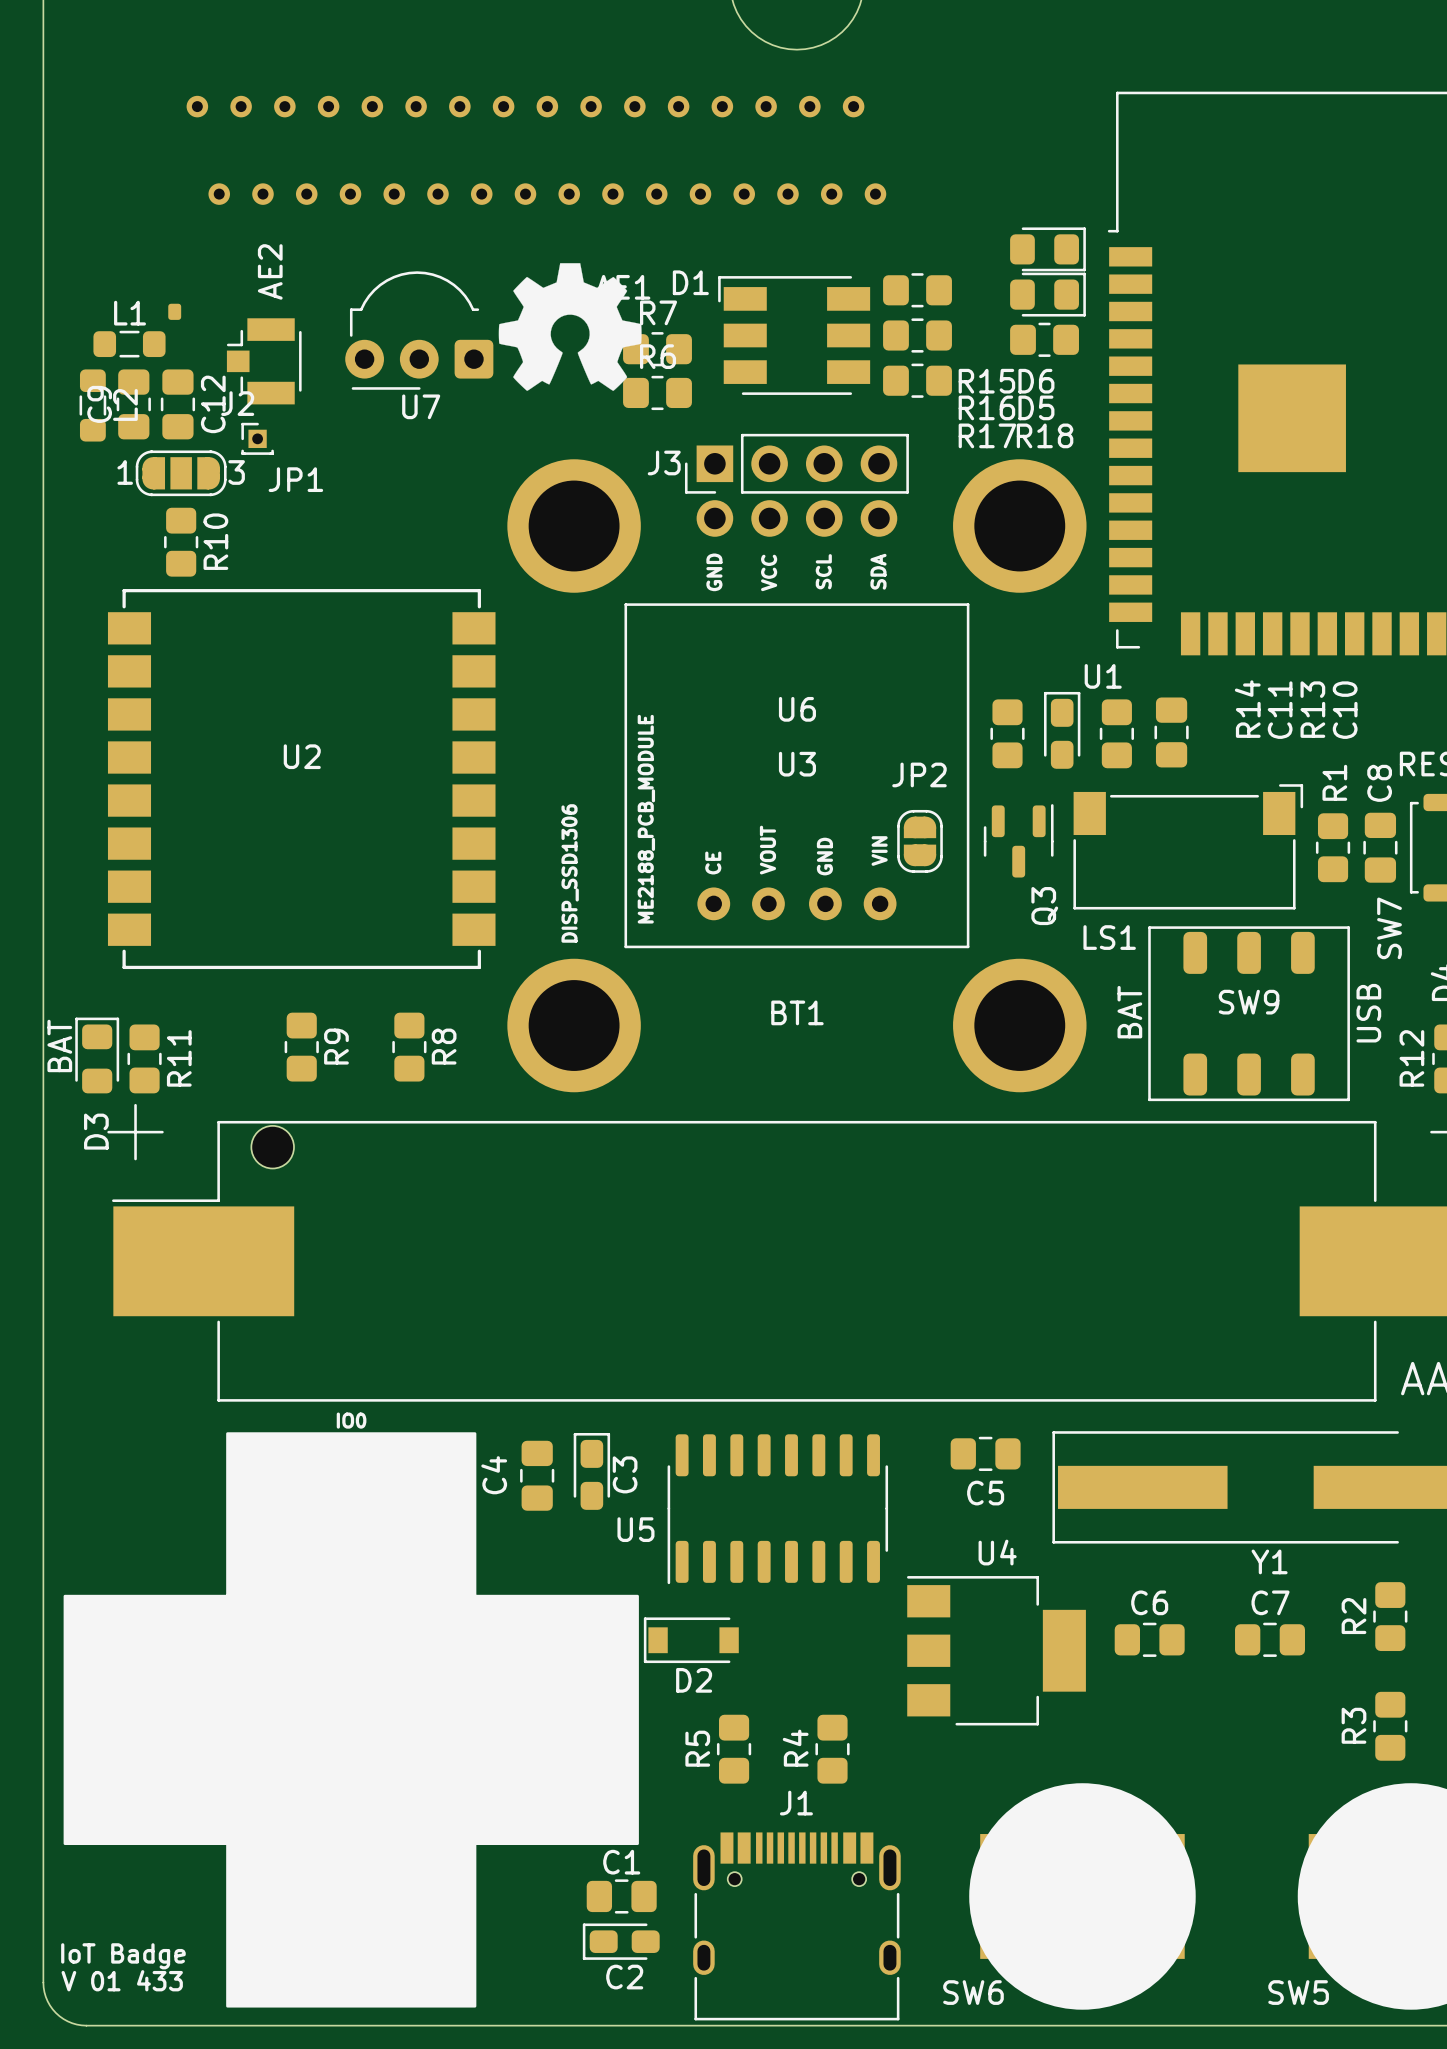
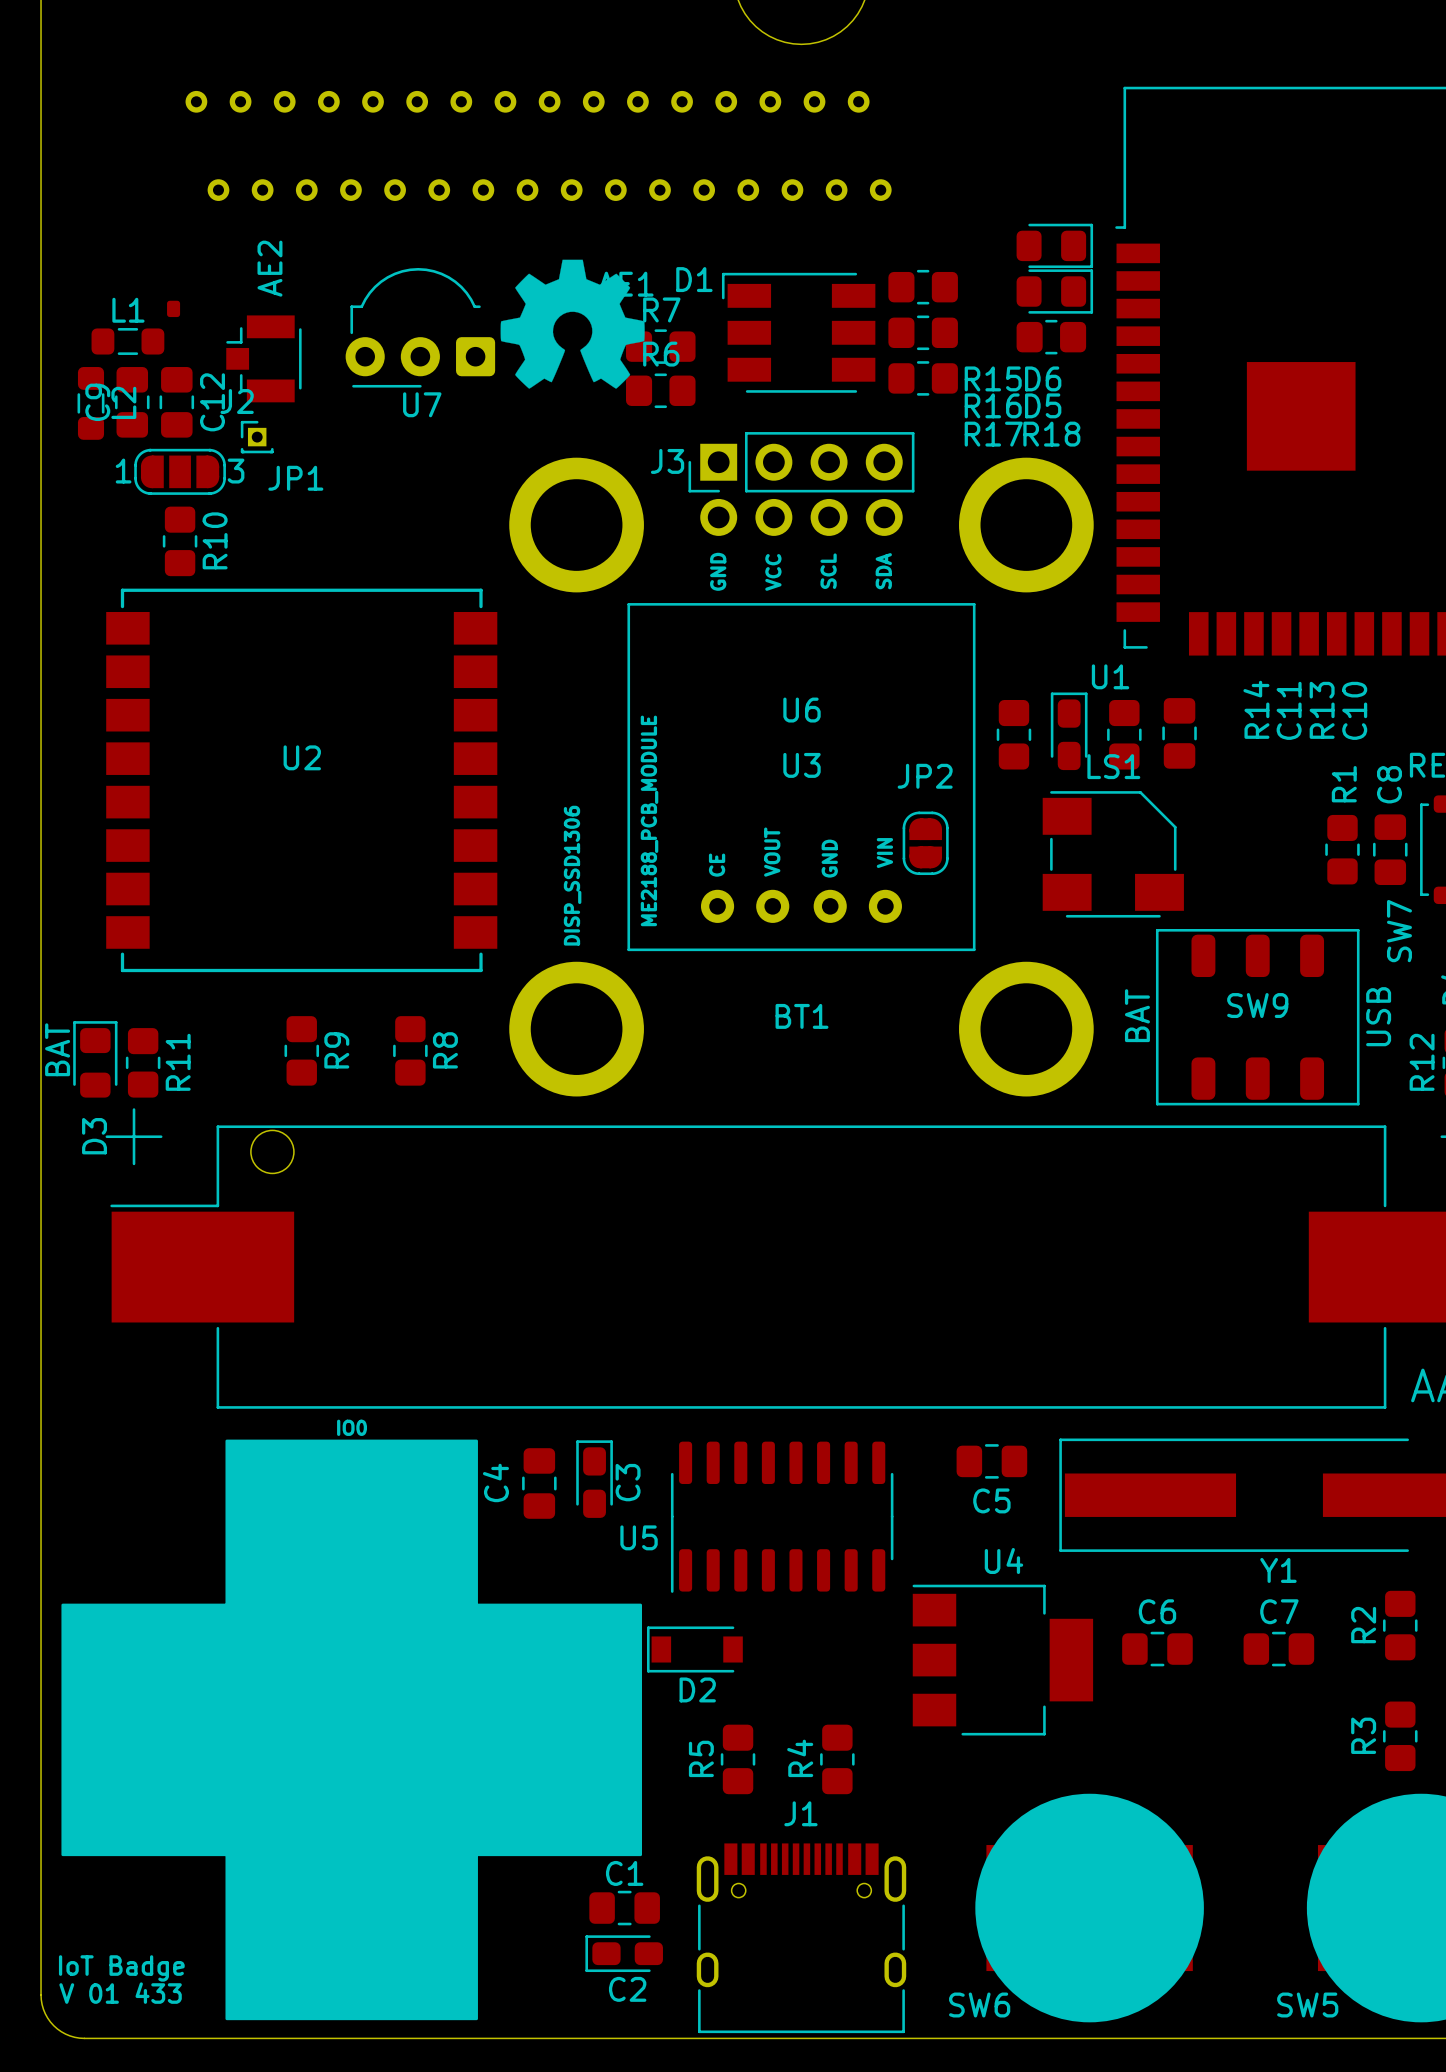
LS1 footprint: [1073, 784, 1304, 910] -> [1042, 791, 1184, 918]
Q3: (1018, 840) -> none
LS1 name position: LS1 (1109, 937) -> LS1 (1113, 766)

